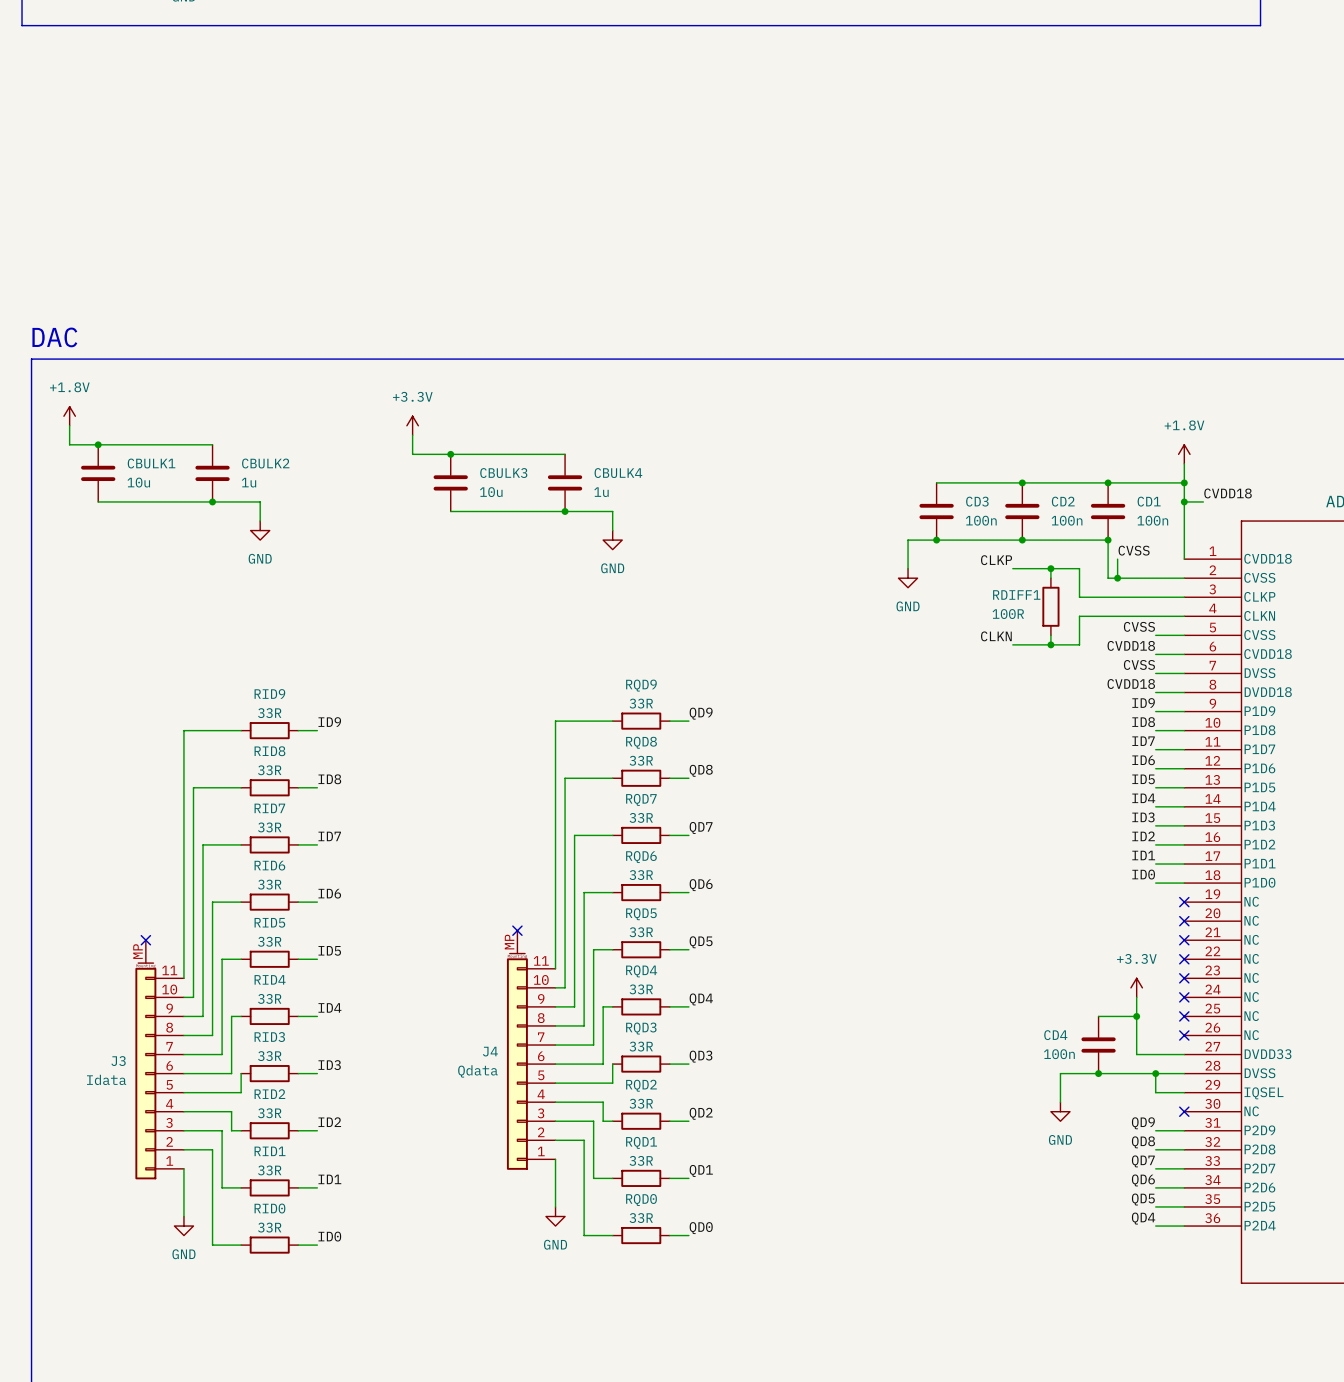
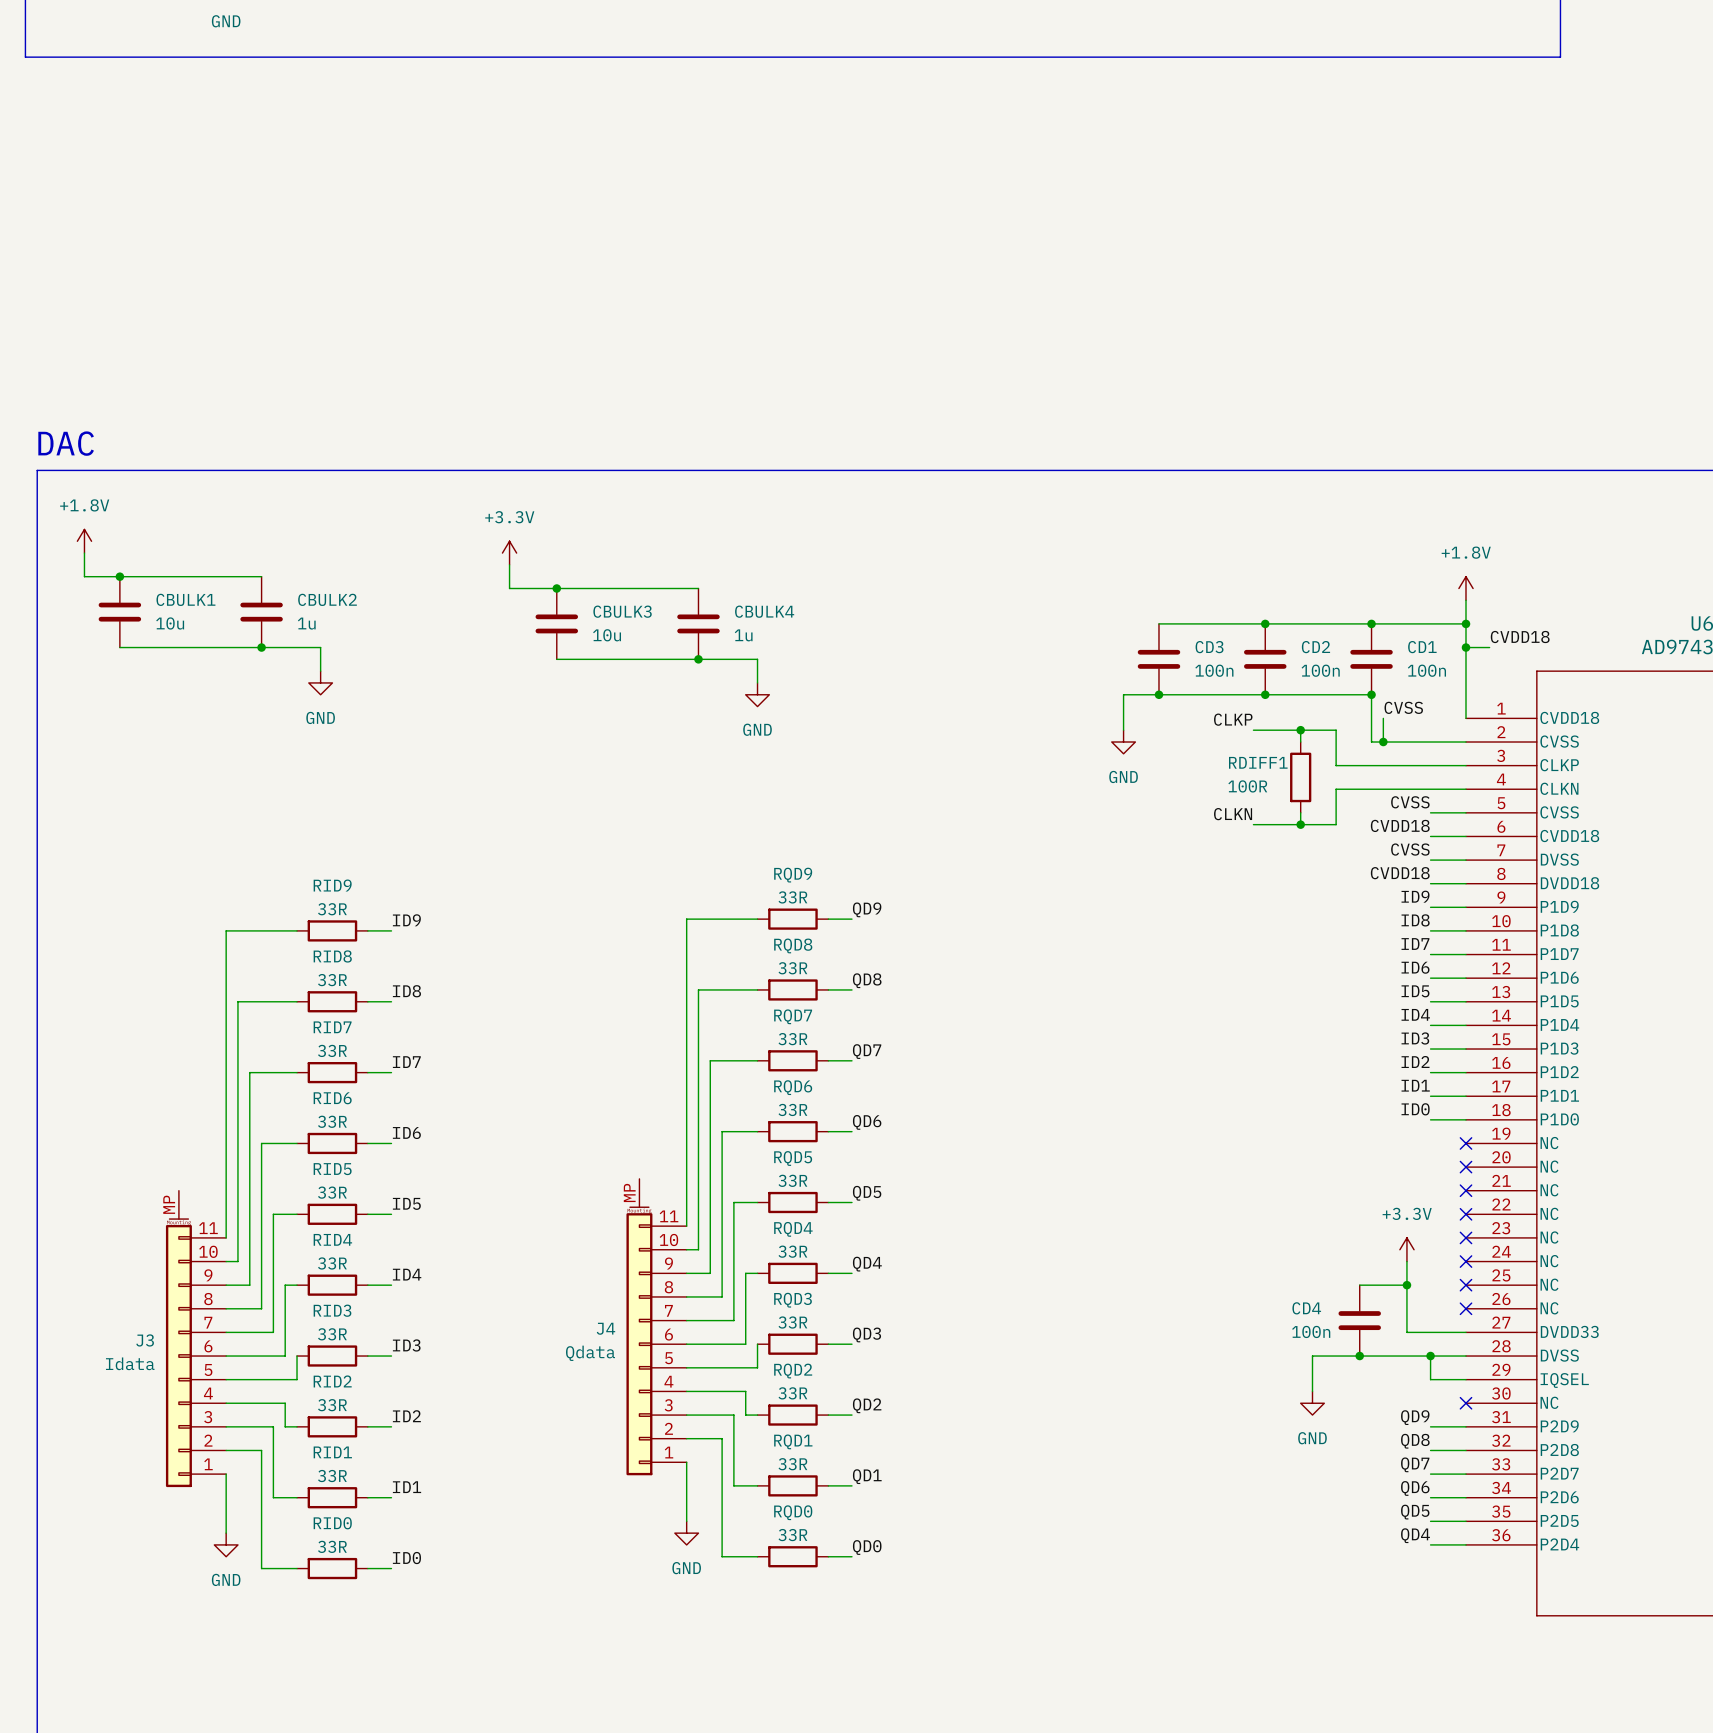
no-connect mark: (517, 930) -> none
no-connect mark: (145, 940) -> none

